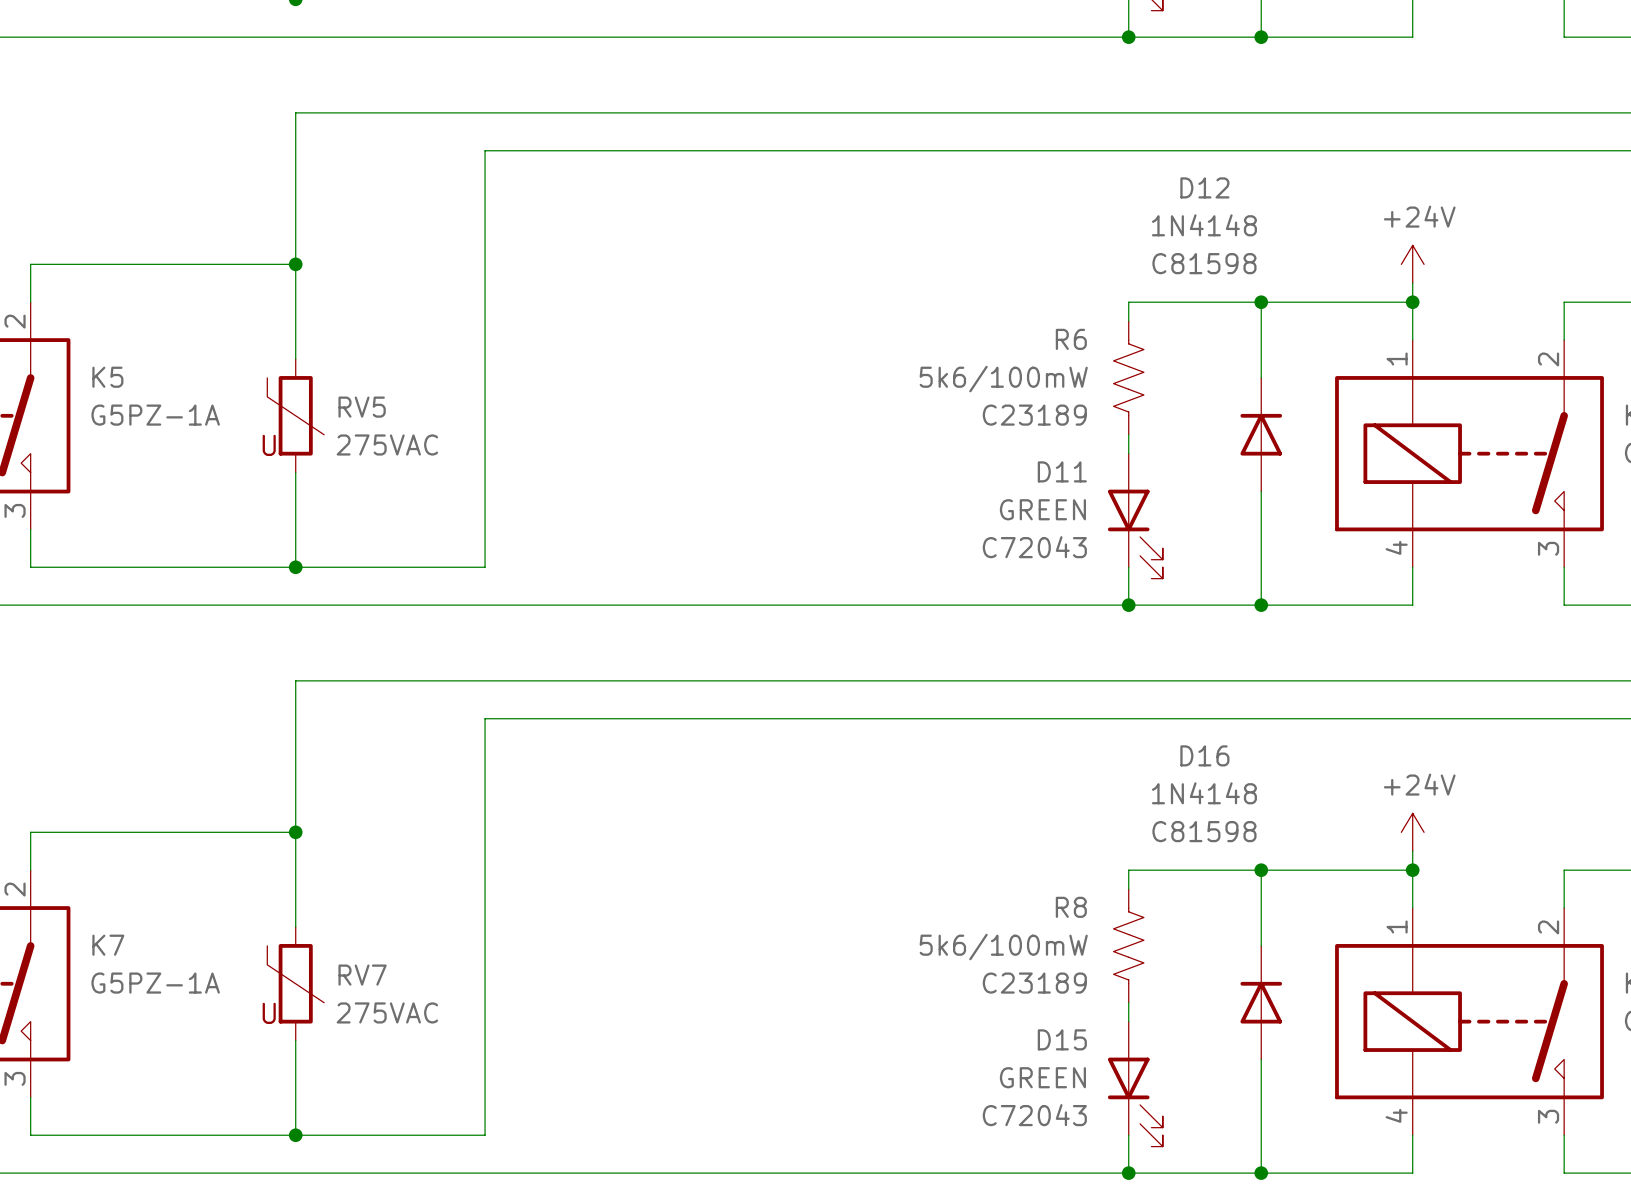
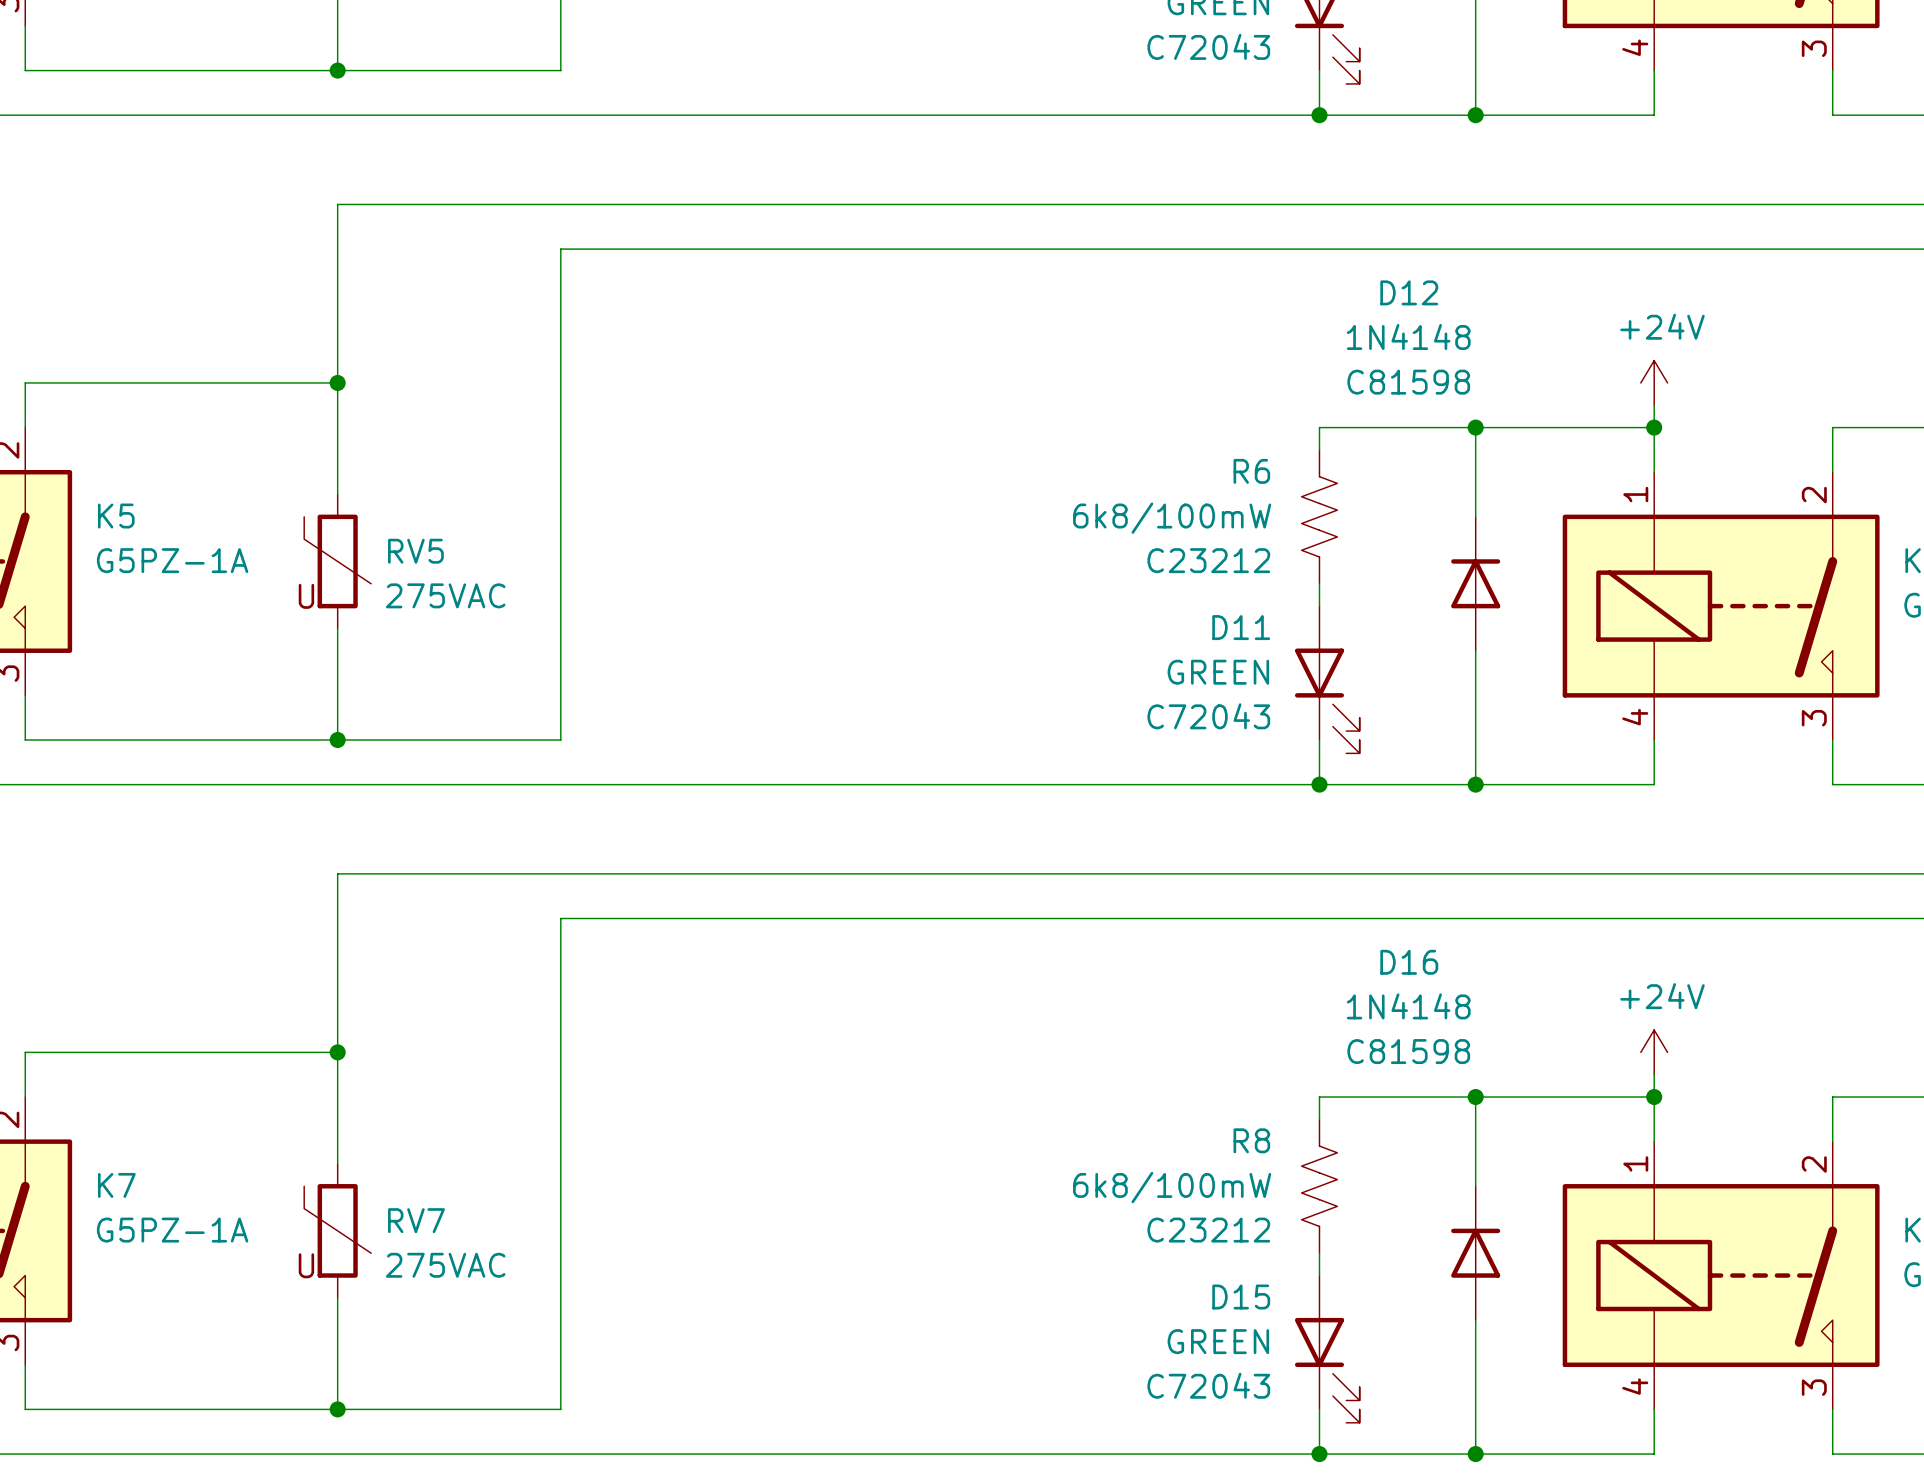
R6 value: 5k6/100mW (1003, 379) -> 6k8/100mW (1172, 518)
R6 text: C23189 (1034, 415) -> C23212 (1208, 560)
R8 value: 5k6/100mW (1003, 947) -> 6k8/100mW (1172, 1187)
R8 text: C23189 (1034, 983) -> C23212 (1208, 1230)

